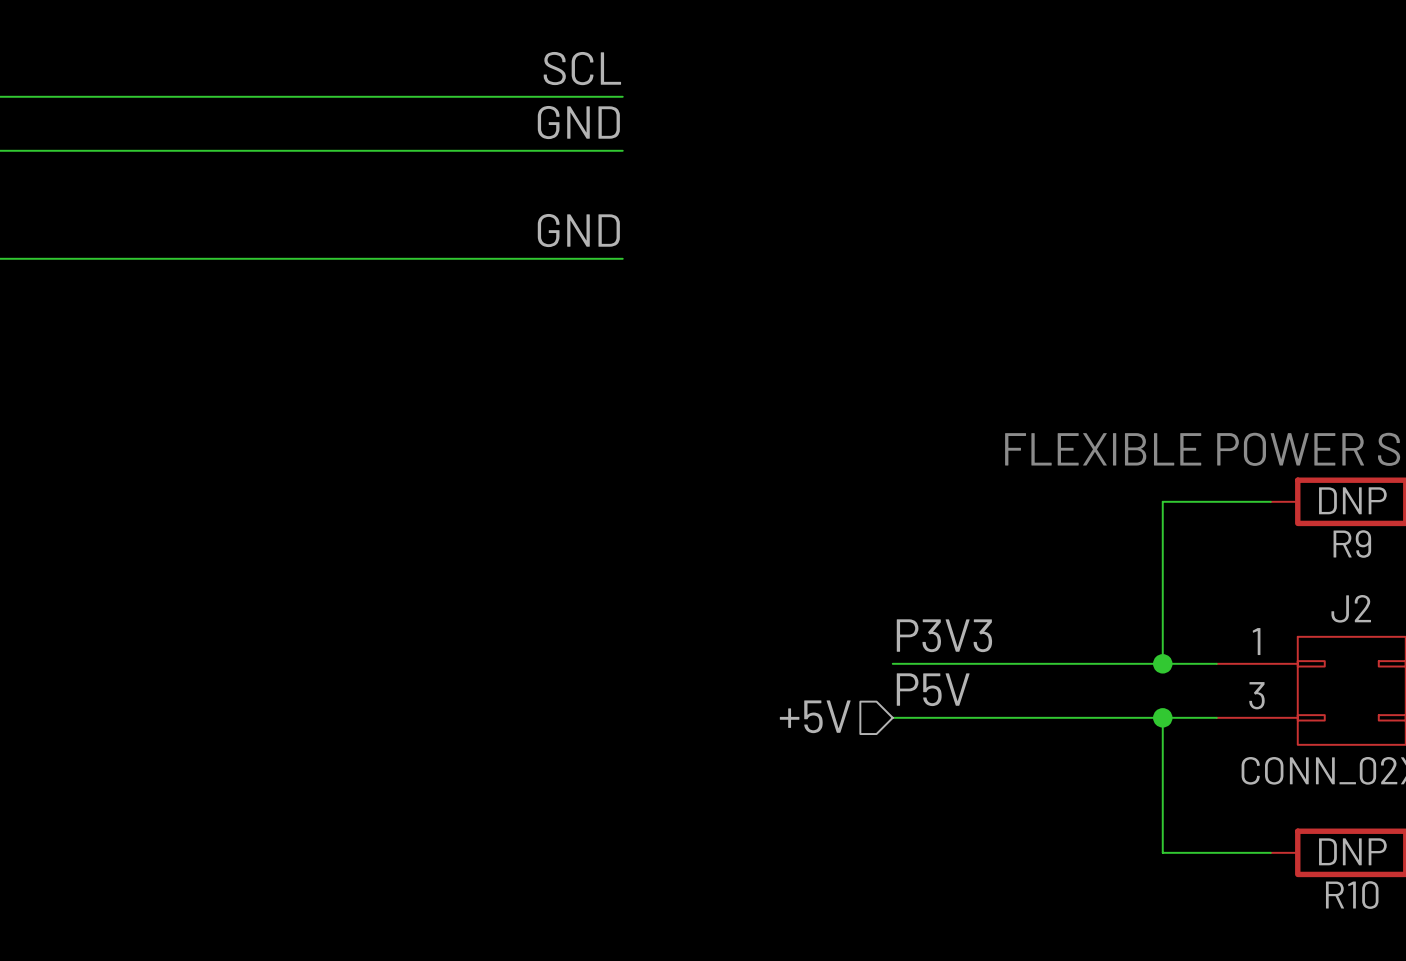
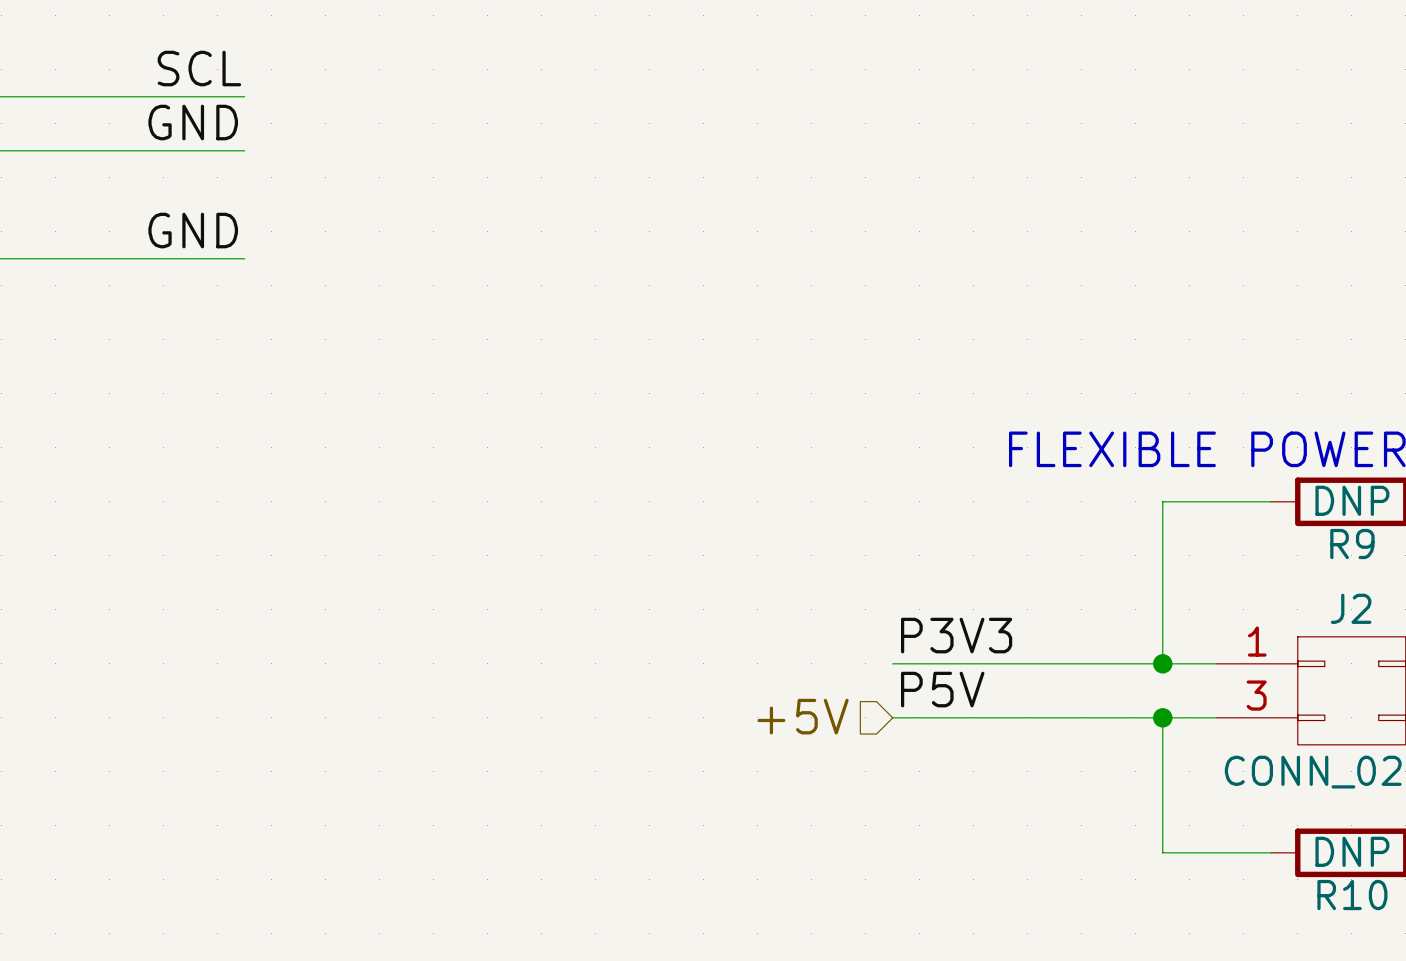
label position: SCL (582, 68) -> SCL (199, 68)
wire: (244, 96) (622, 96) -> none
label: none -> GND (193, 122)
label: GND (578, 122) -> none
wire: (244, 150) (622, 150) -> none
label: none -> GND (193, 230)
label: GND (578, 230) -> none
wire: (244, 258) (622, 258) -> none

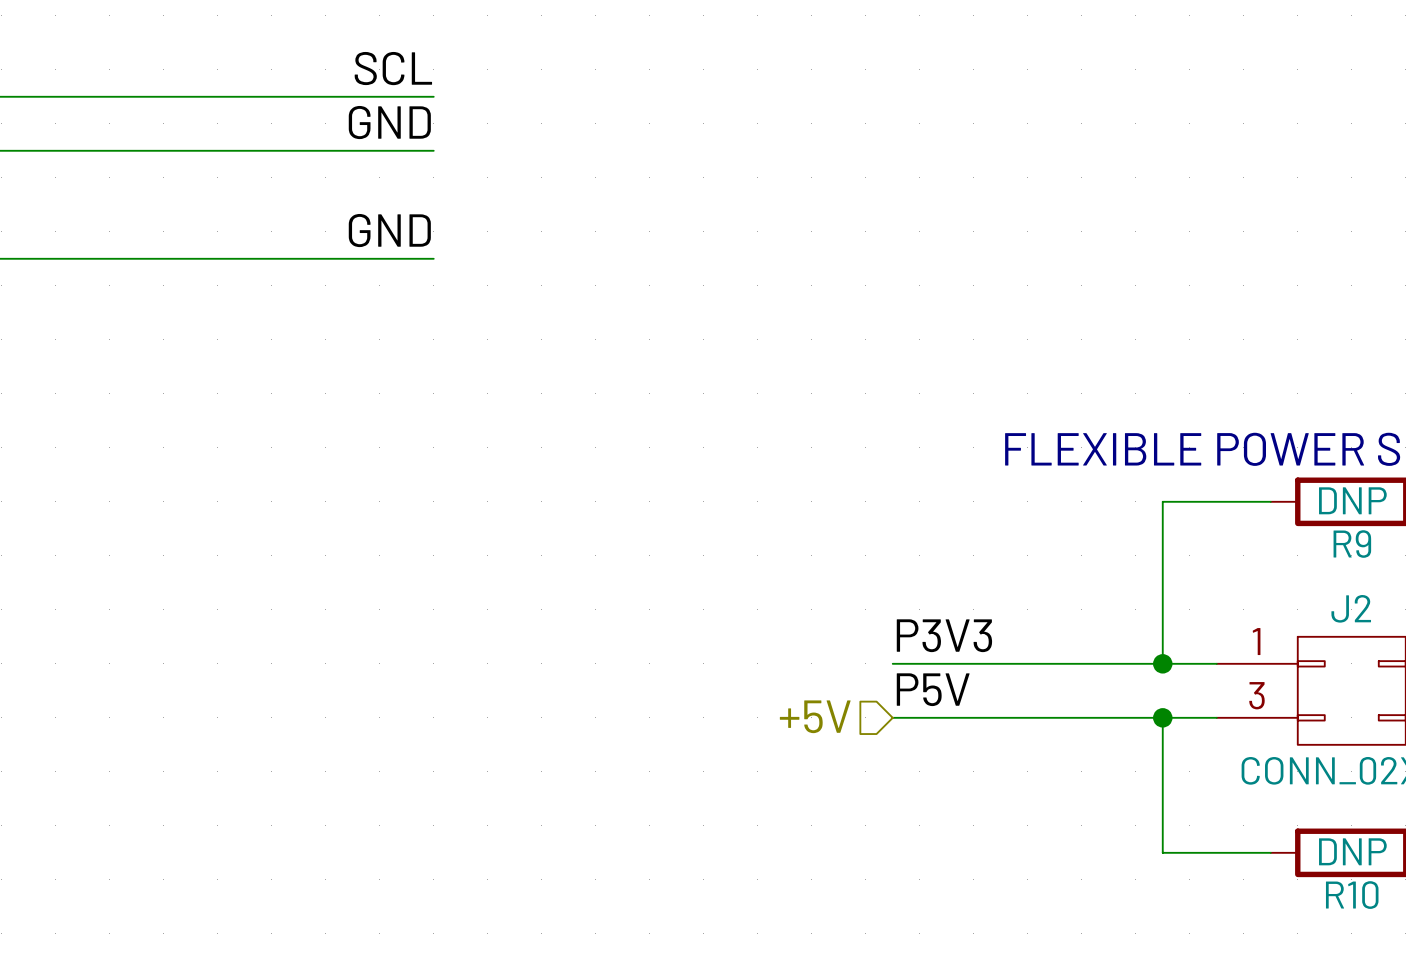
label position: SCL (199, 68) -> SCL (393, 68)
wire: none -> (244, 96) (433, 96)
label: GND (193, 122) -> none
label: none -> GND (389, 122)
wire: none -> (244, 150) (433, 150)
label: GND (193, 230) -> none
label: none -> GND (389, 230)
wire: none -> (244, 258) (433, 258)

